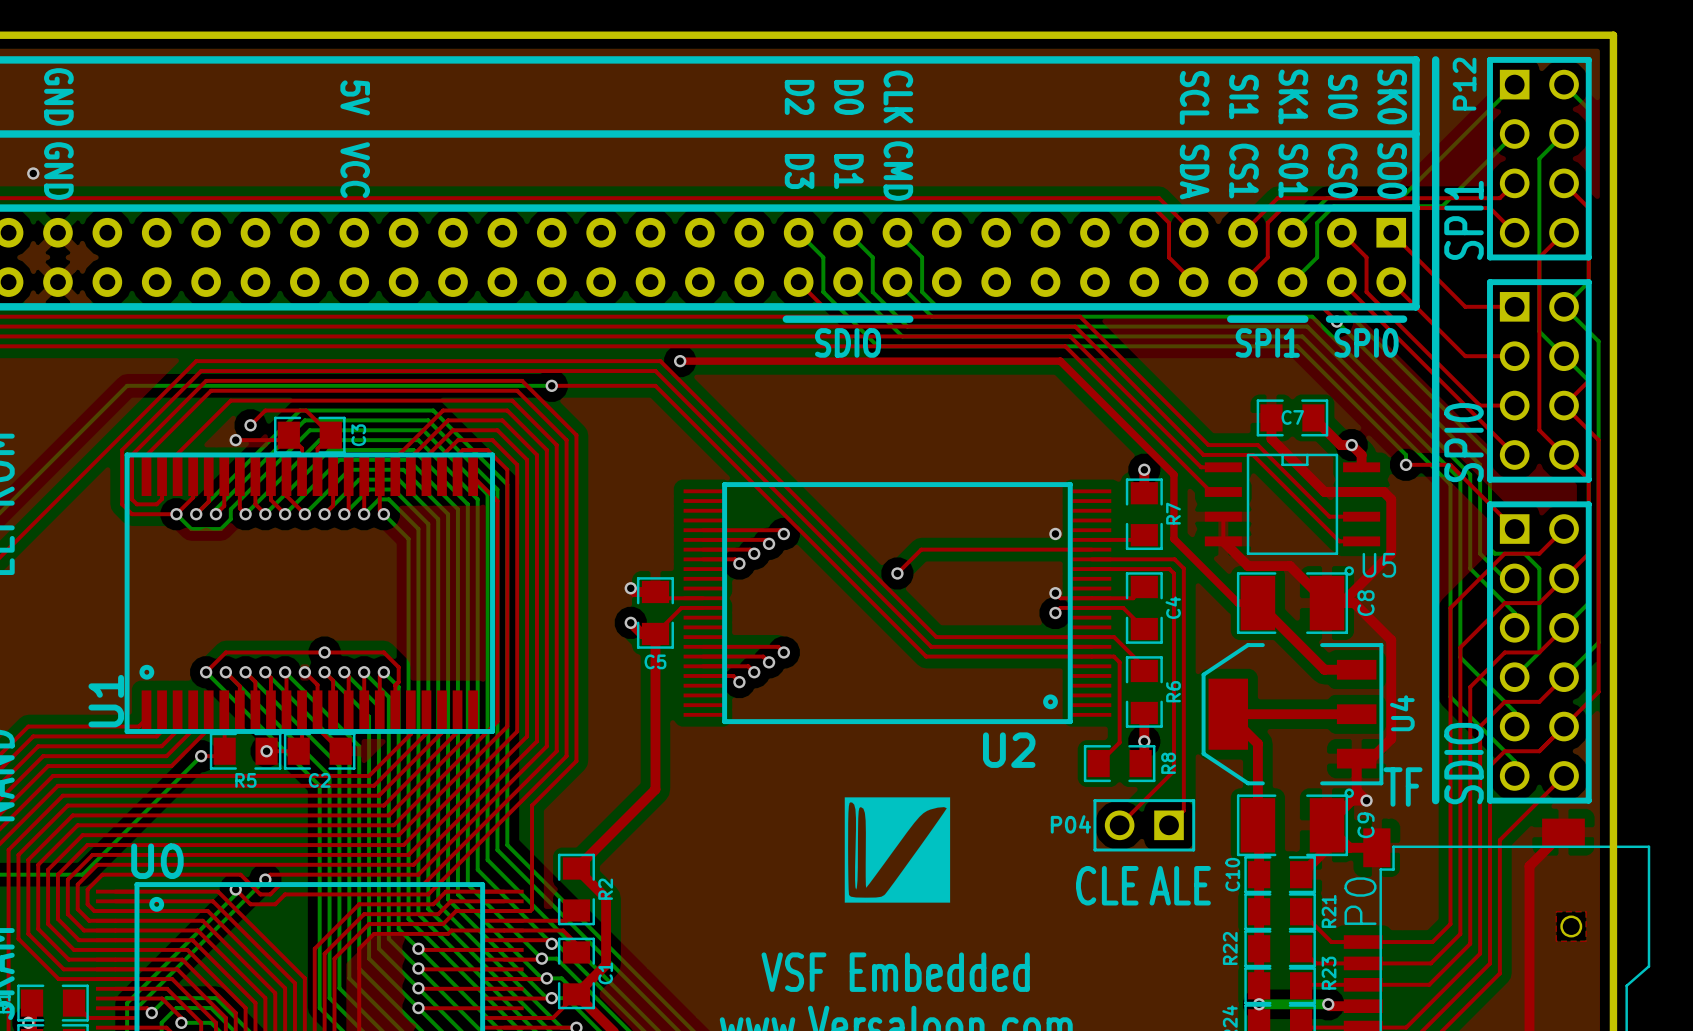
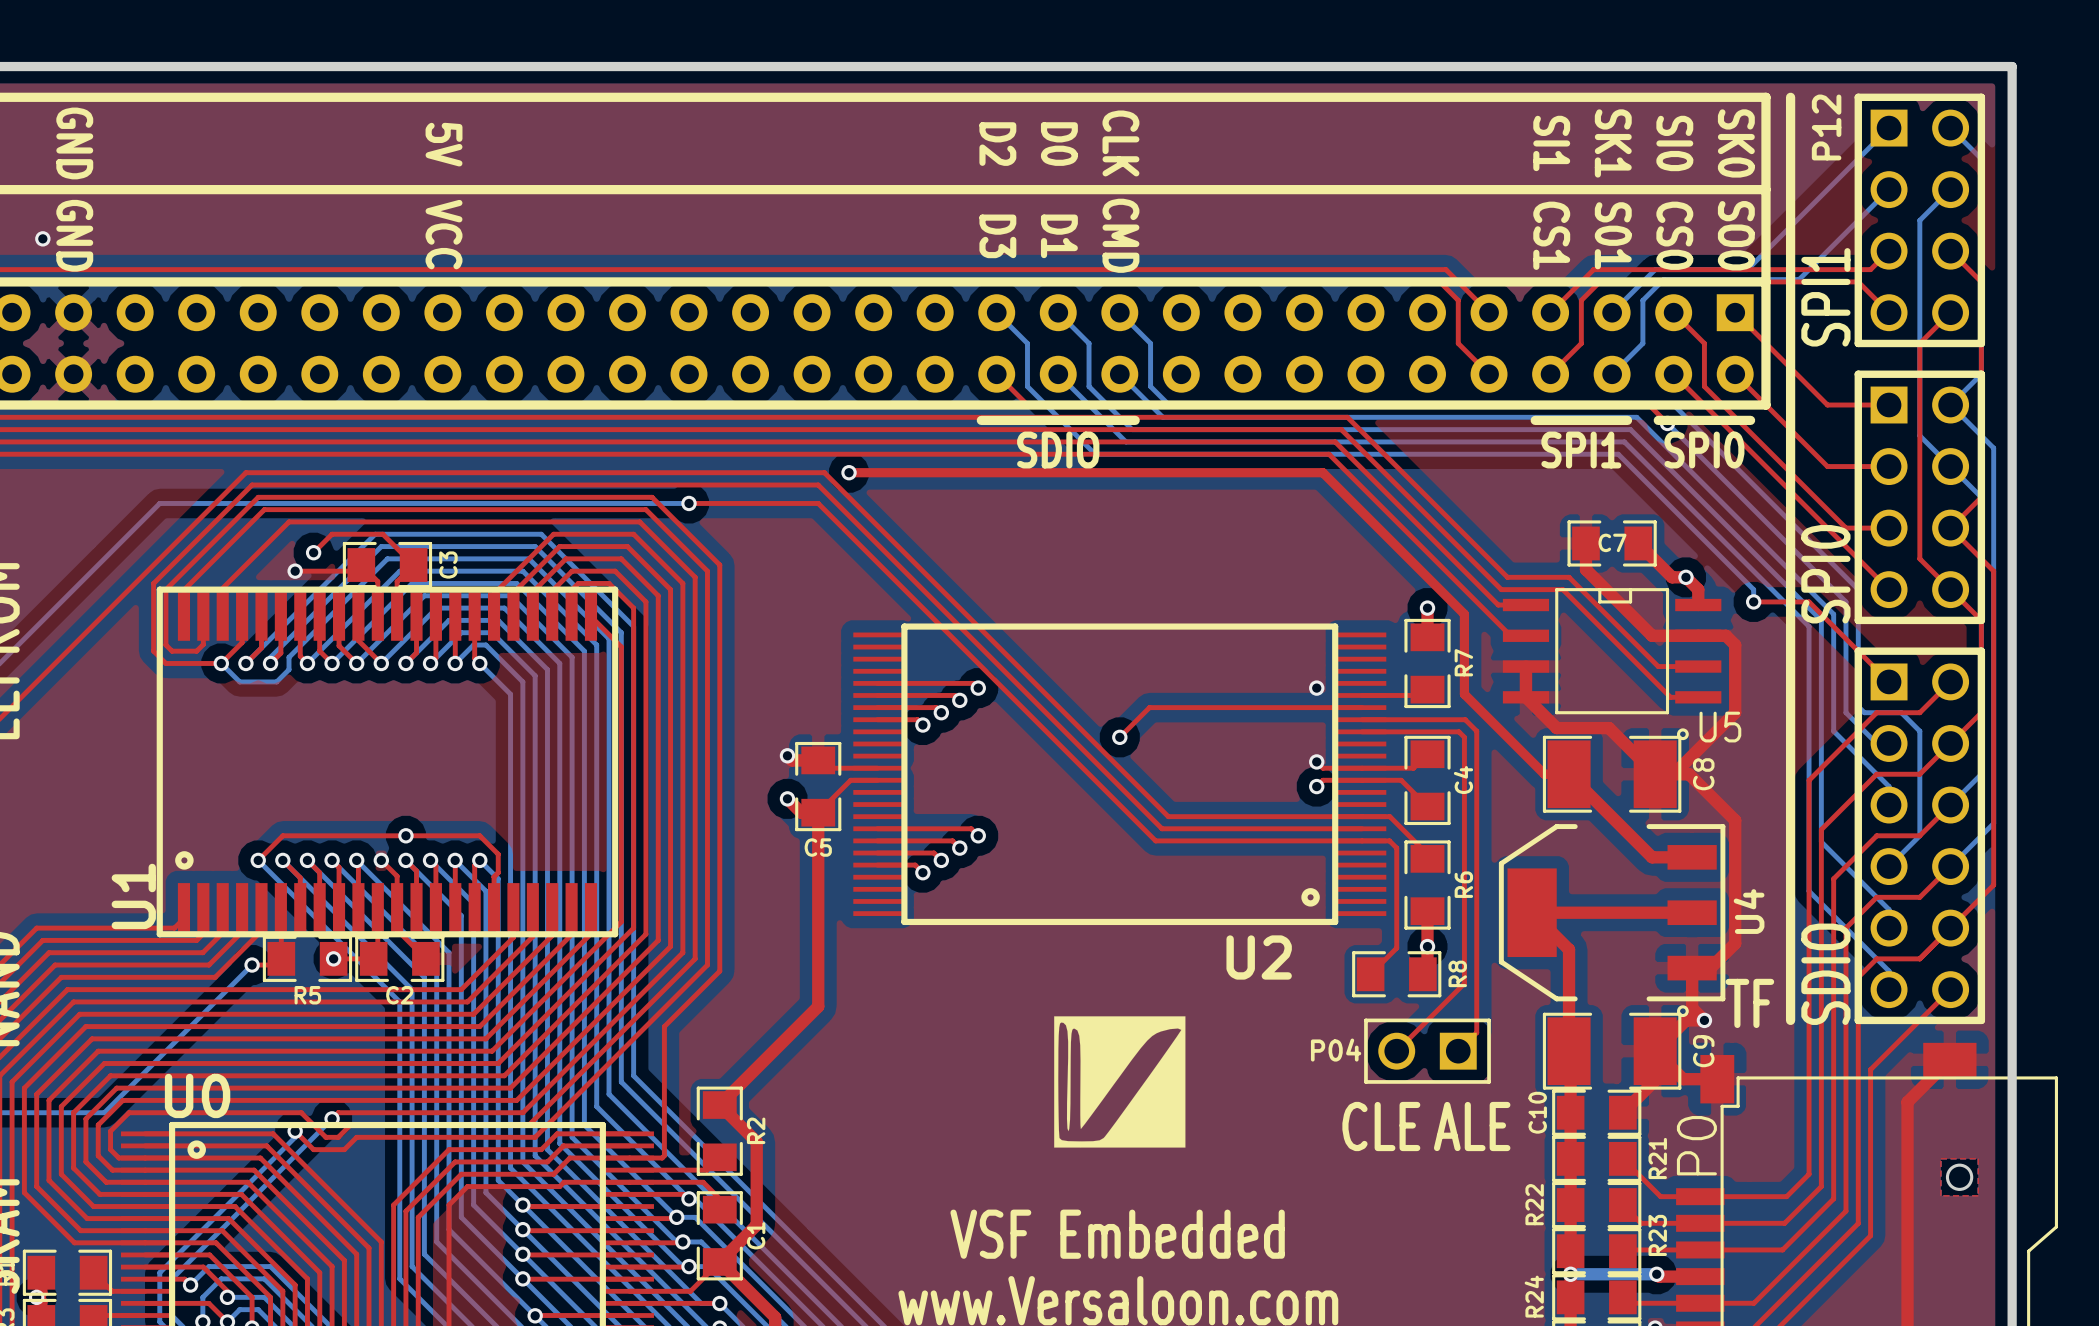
text: SCL (1194, 97) -> none
text: SDA (1194, 171) -> none
top track width: thin (1223, 516) (1223, 541) -> thick (1525, 666) (1525, 697)

